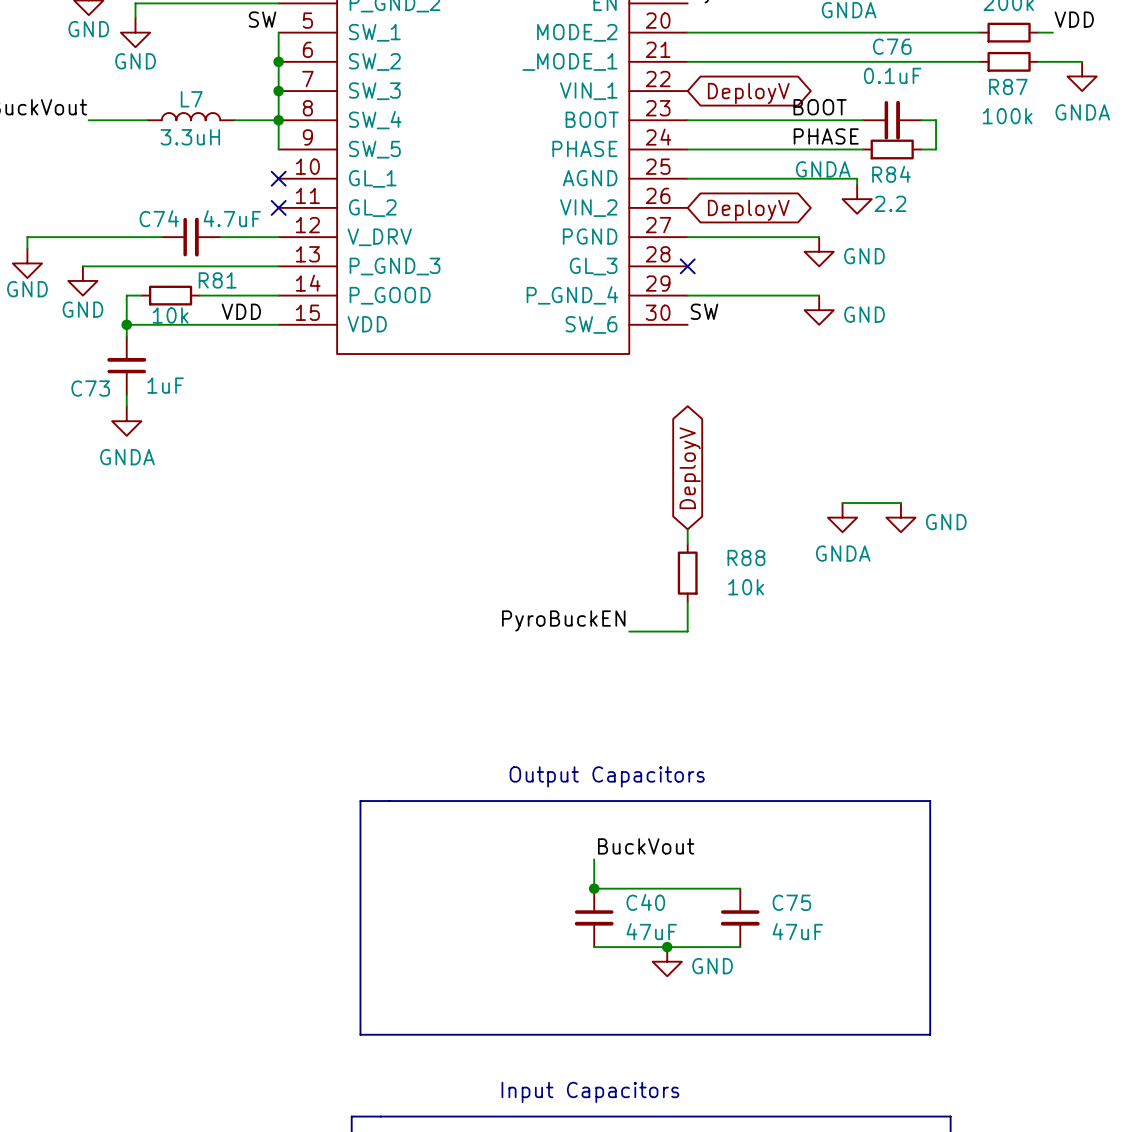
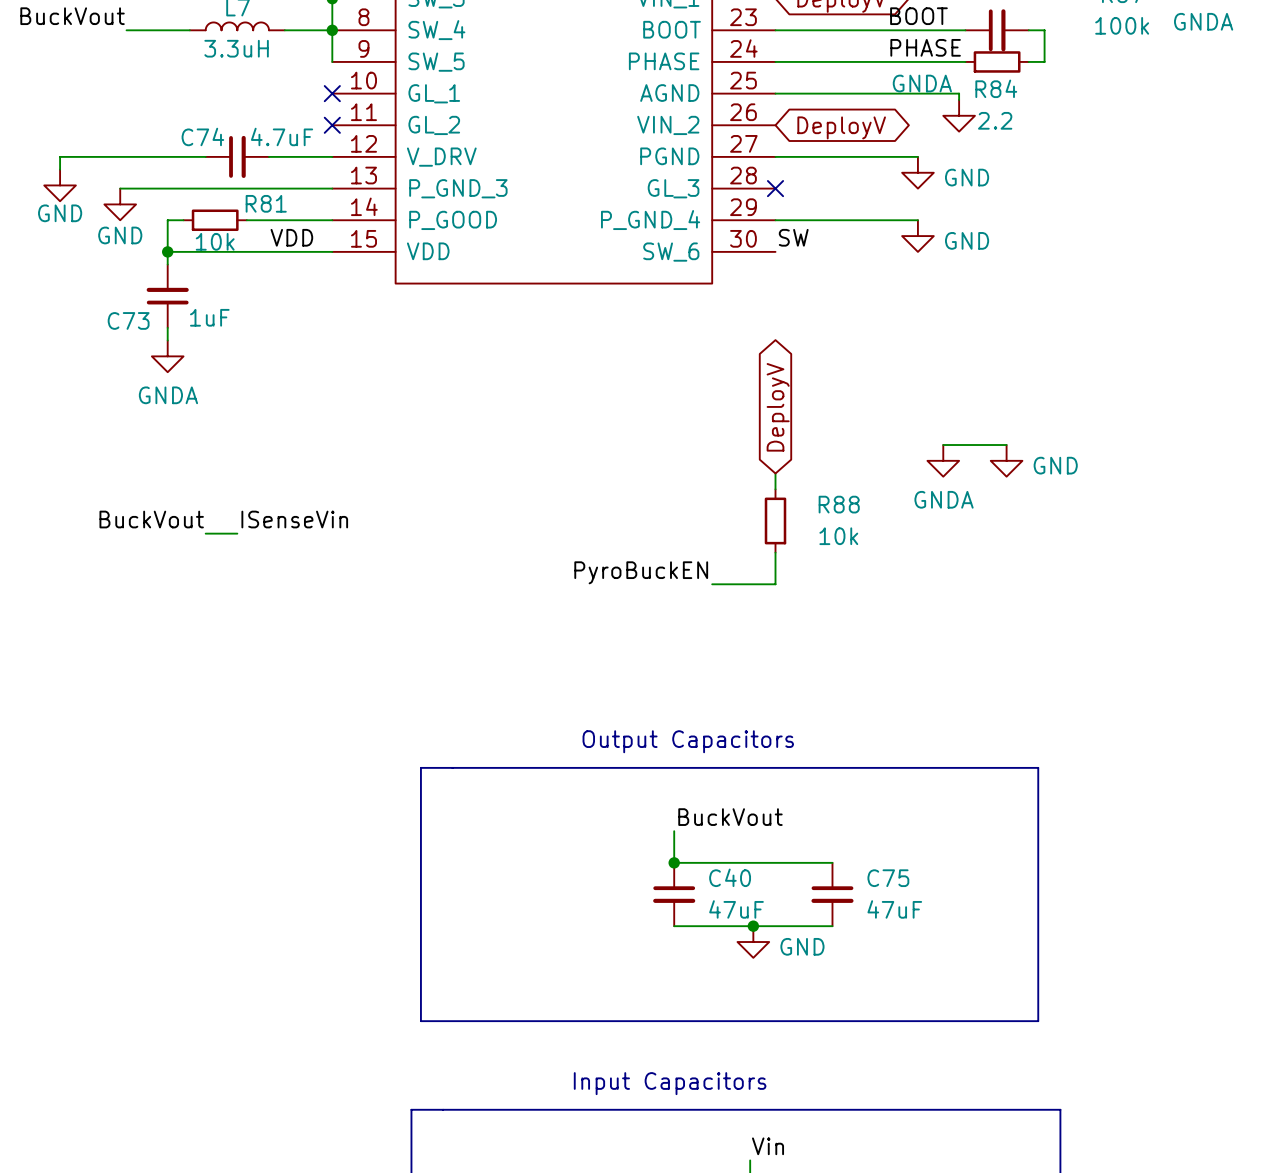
label: none -> BuckVout (151, 519)
label: none -> ISenseVin (294, 519)
wire: none -> (205, 533) (237, 533)

